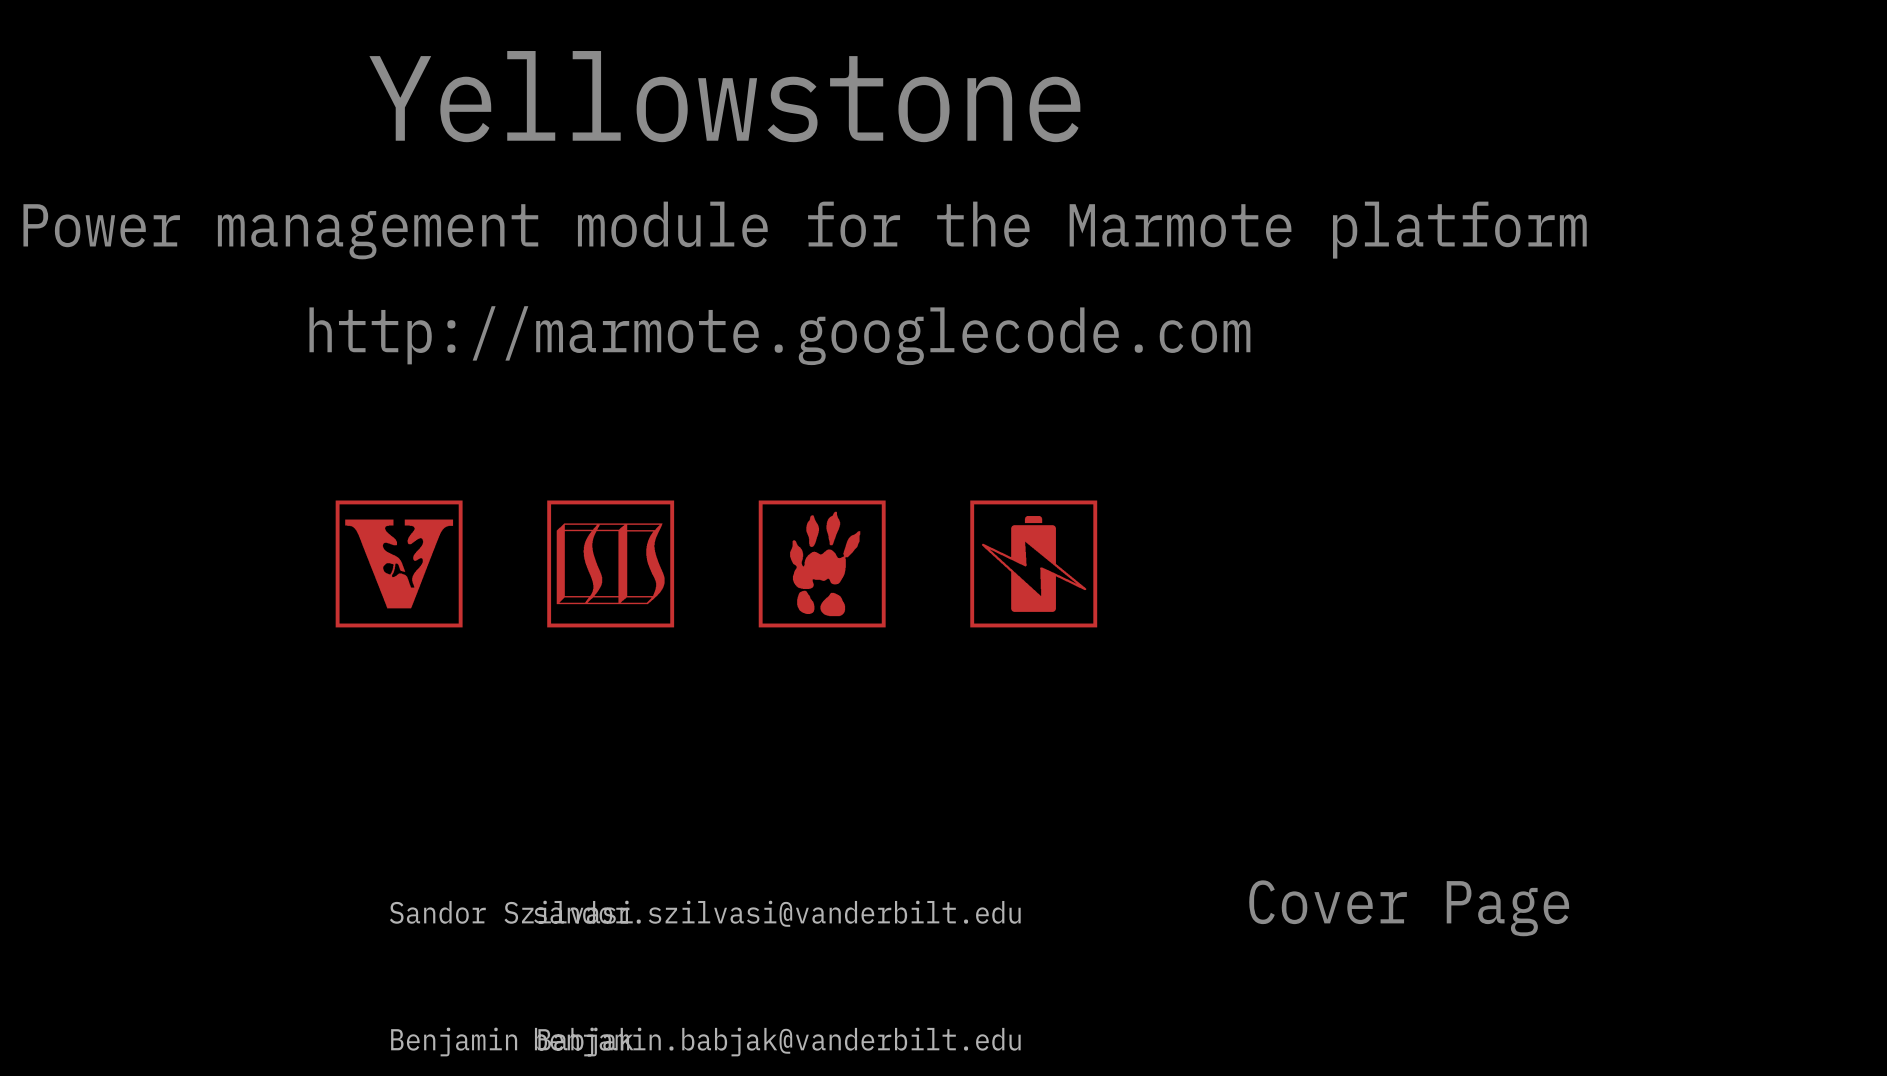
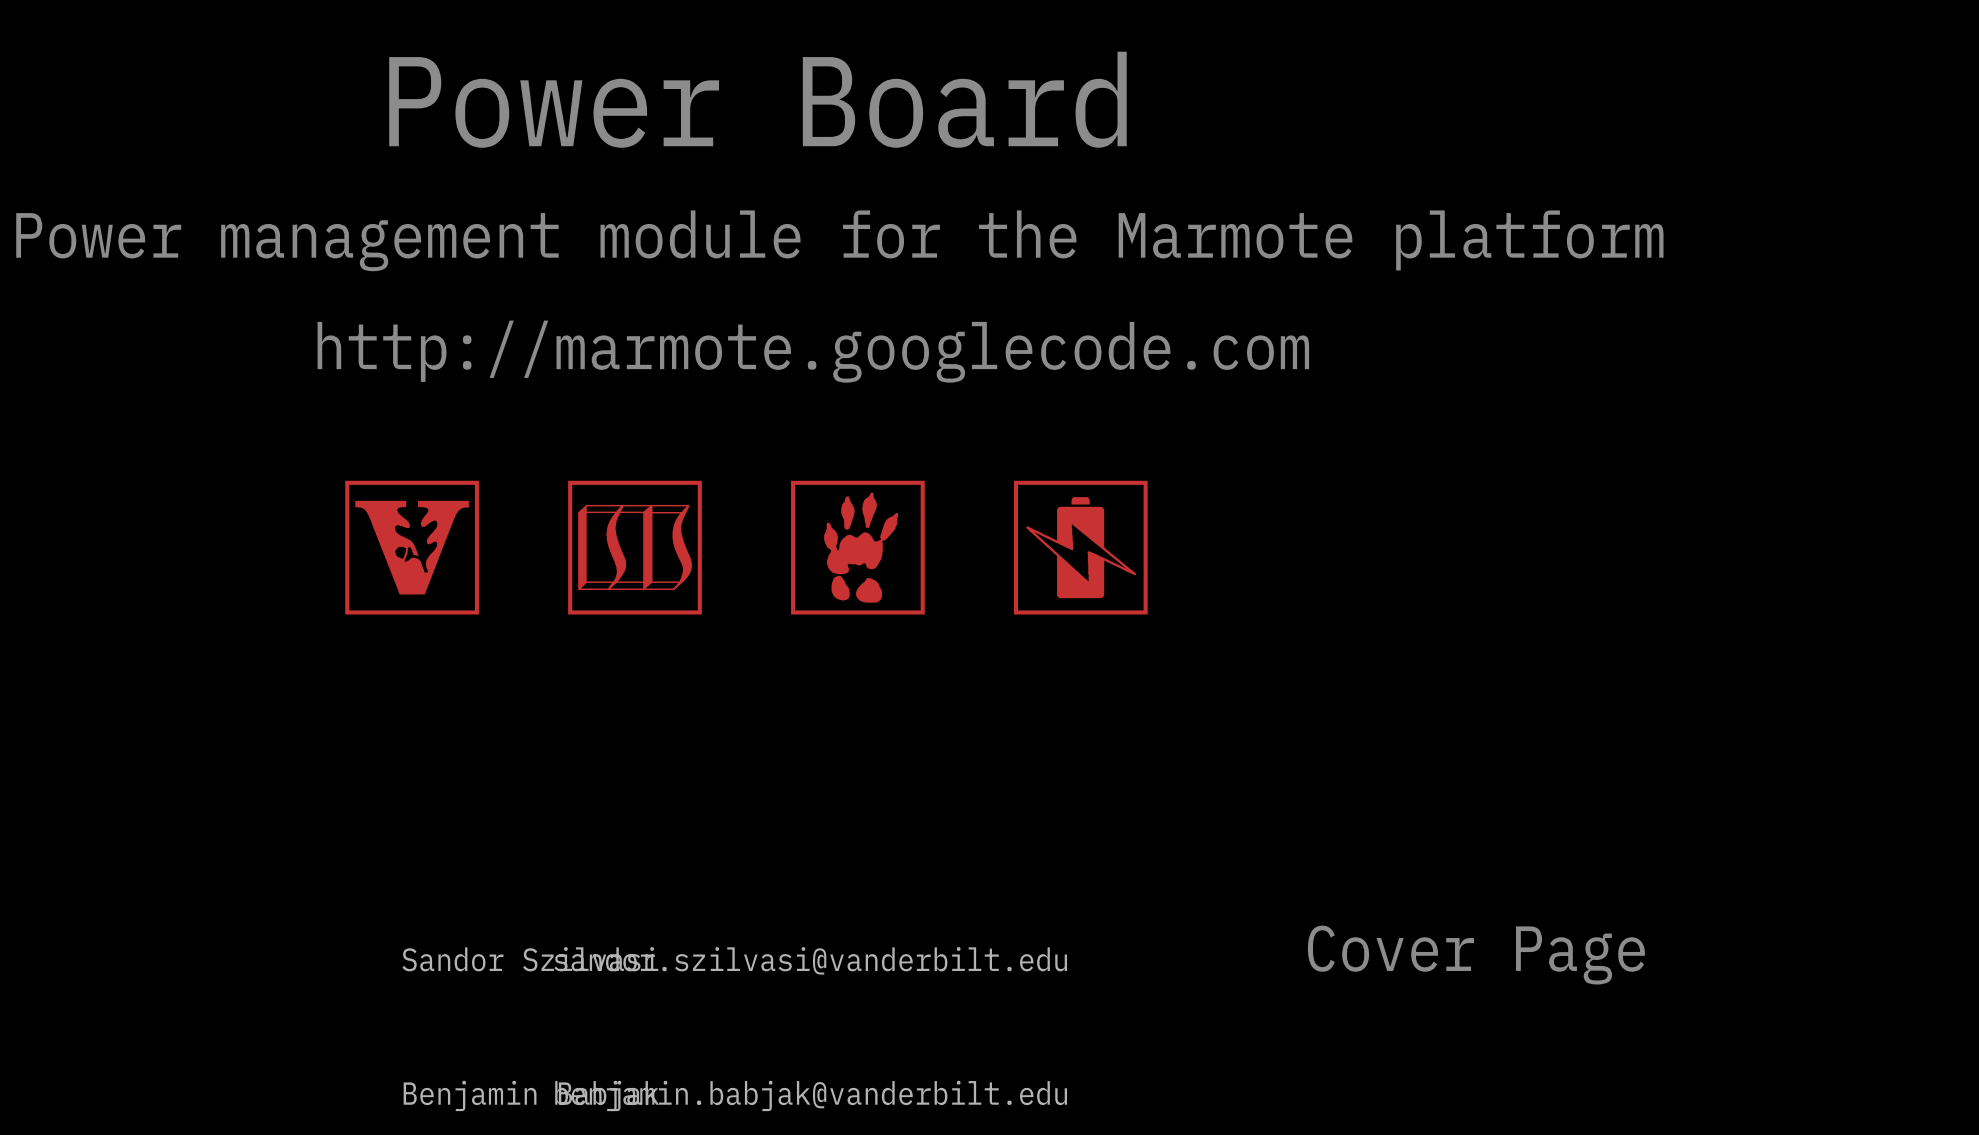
text: Yellowstone (724, 96) -> Power Board (757, 99)
part position: (399, 563) -> (412, 547)
part position: (610, 563) -> (635, 547)
part position: (822, 563) -> (857, 547)
part position: (1033, 563) -> (1080, 547)

